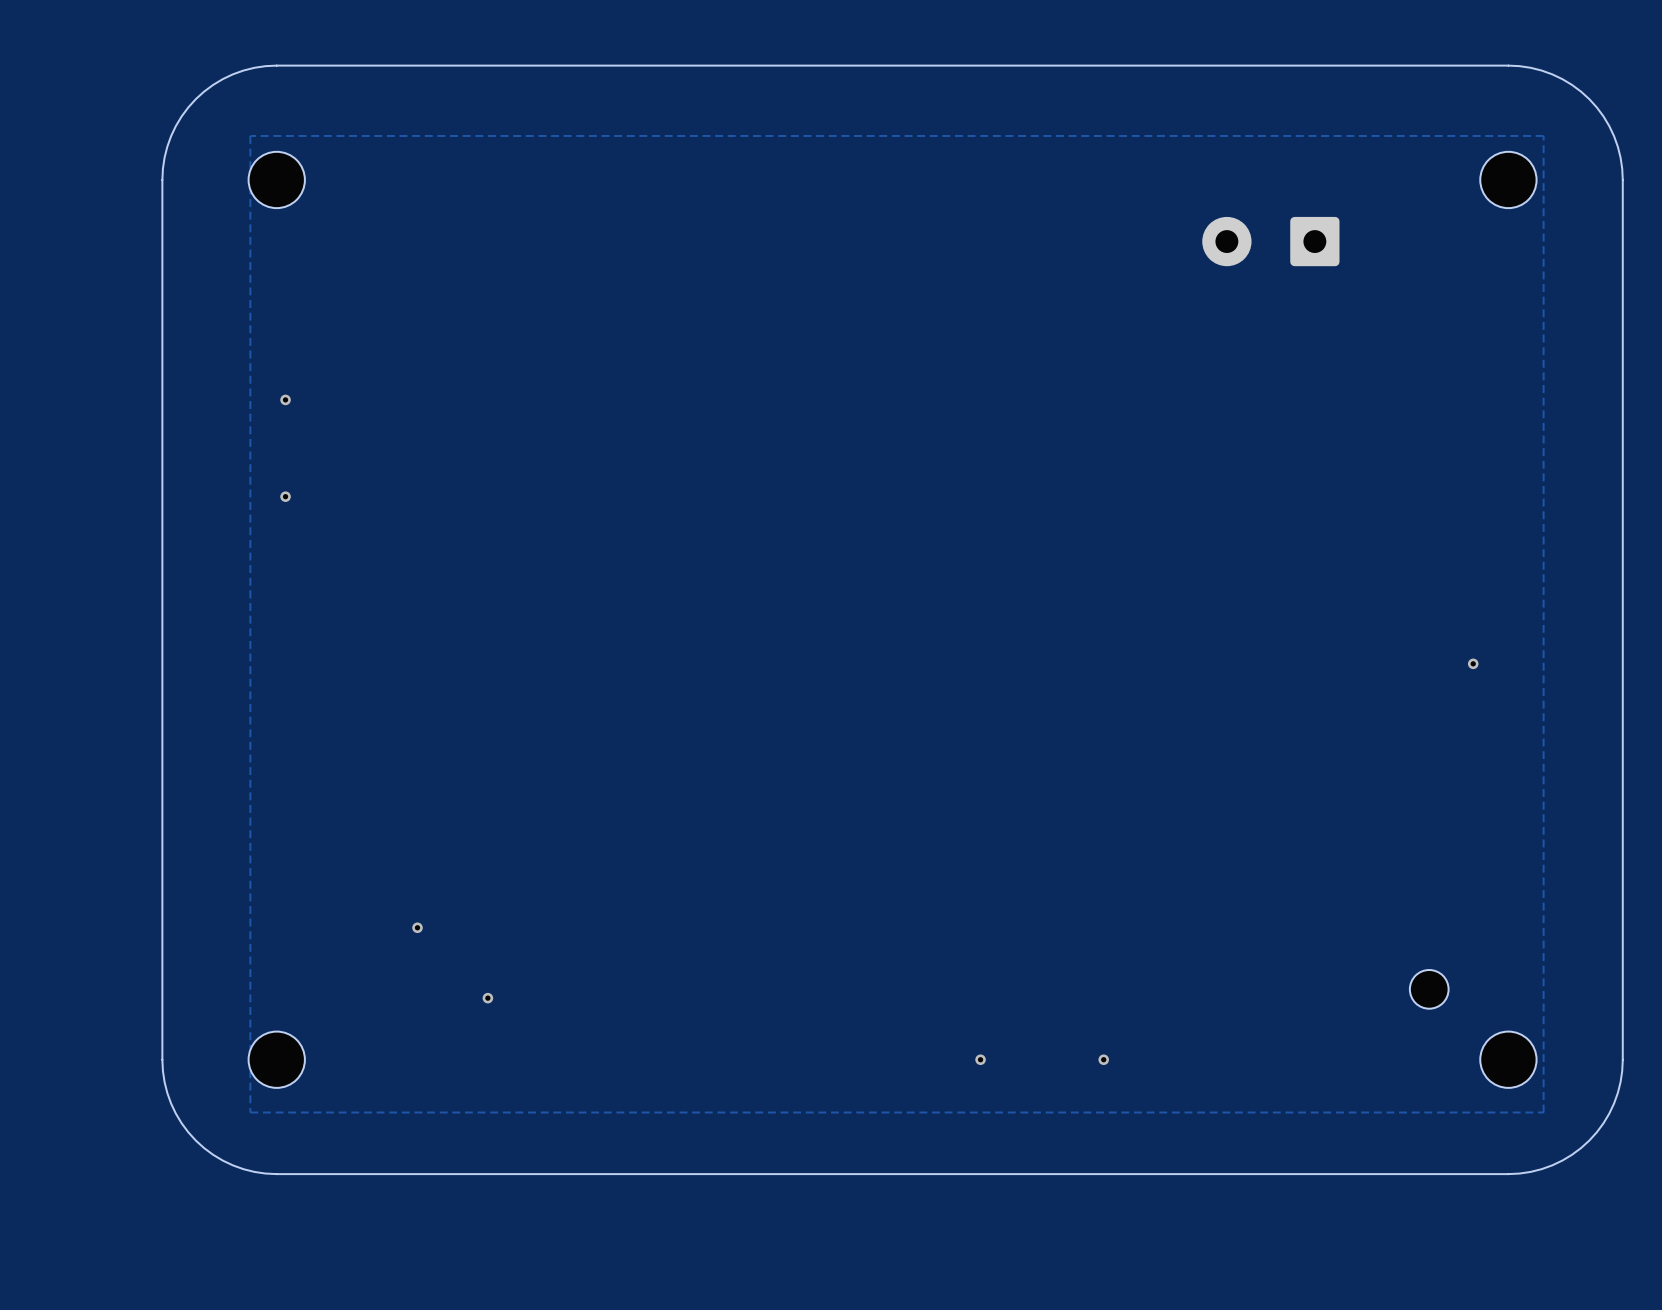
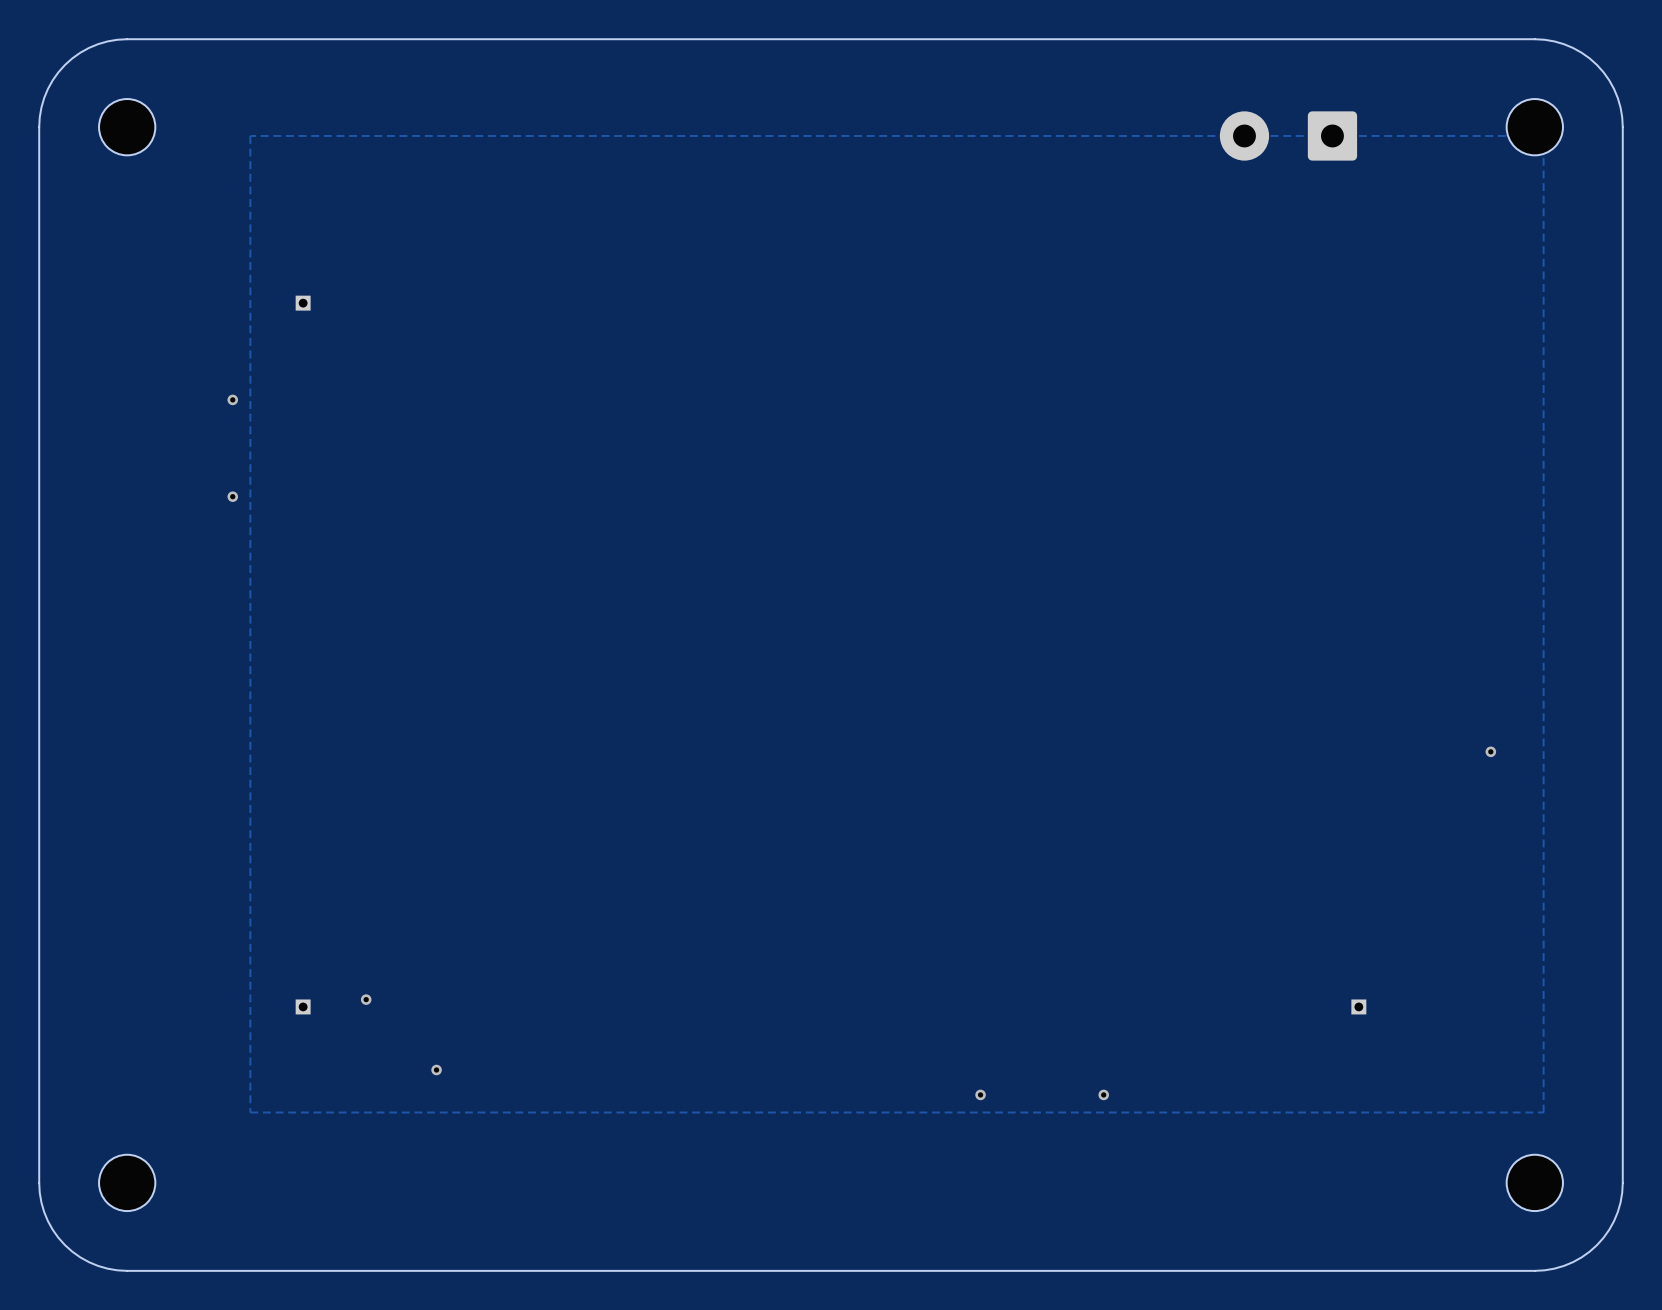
part position: (276, 179) -> (127, 127)
part position: (1508, 179) -> (1534, 127)
board edge: (1622, 179) (1620, 157) (1614, 136) (1603, 116) (1589, 99) (1571, 84) (1552, 74) (1530, 67) (1508, 65) (265, 66) (243, 70) (222, 79) (195, 99) (181, 116) (171, 136) (164, 157) (162, 179) (162, 1070) (167, 1092) (175, 1113) (195, 1140) (213, 1154) (243, 1169) (276, 1174) (1519, 1173) (1552, 1165) (1571, 1154) (1589, 1140) (1603, 1123) (1614, 1103) (1620, 1082) (1622, 1059) -> (1622, 179) (1622, 117) (1617, 98) (1609, 80) (1597, 64) (1581, 52) (1563, 44) (1544, 39) (127, 39) (107, 41) (80, 52) (64, 64) (52, 80) (44, 98) (39, 127) (39, 1192) (44, 1211) (52, 1229) (72, 1251) (98, 1265) (127, 1270) (1544, 1270) (1572, 1262) (1589, 1251) (1603, 1237) (1617, 1211) (1622, 1182) (1622, 1059)
part position: (1270, 241) -> (1288, 135)
part: none -> (303, 303)
via position: (285, 399) -> (232, 399)
via position: (285, 496) -> (232, 496)
via position: (1473, 663) -> (1490, 751)
via: (417, 927) -> none
part: (1429, 989) -> none
via: (487, 998) -> none
via: none -> (366, 999)
part: none -> (303, 1006)
part: none -> (1358, 1006)
part position: (276, 1059) -> (127, 1182)
via position: (980, 1059) -> (980, 1094)
via position: (1103, 1059) -> (1103, 1094)
part position: (1508, 1059) -> (1534, 1182)
via: none -> (436, 1070)

